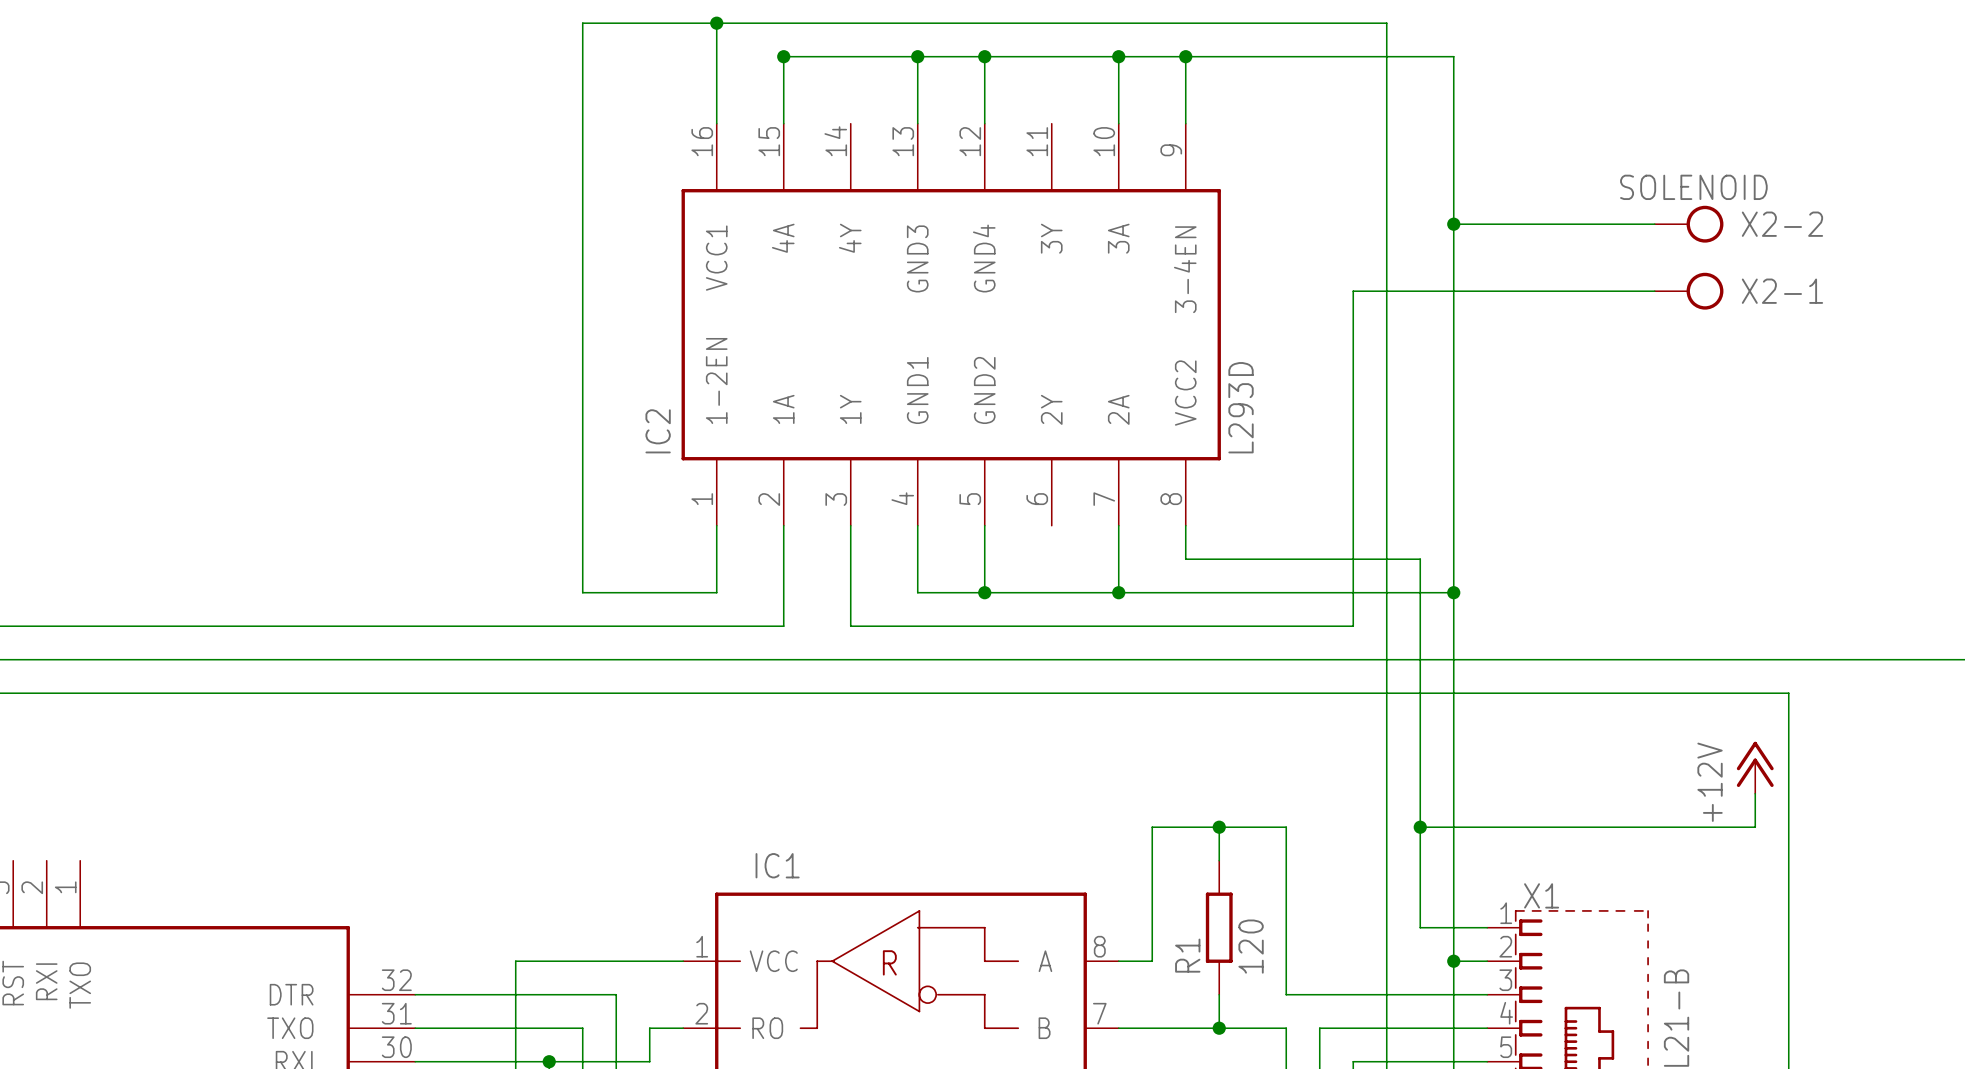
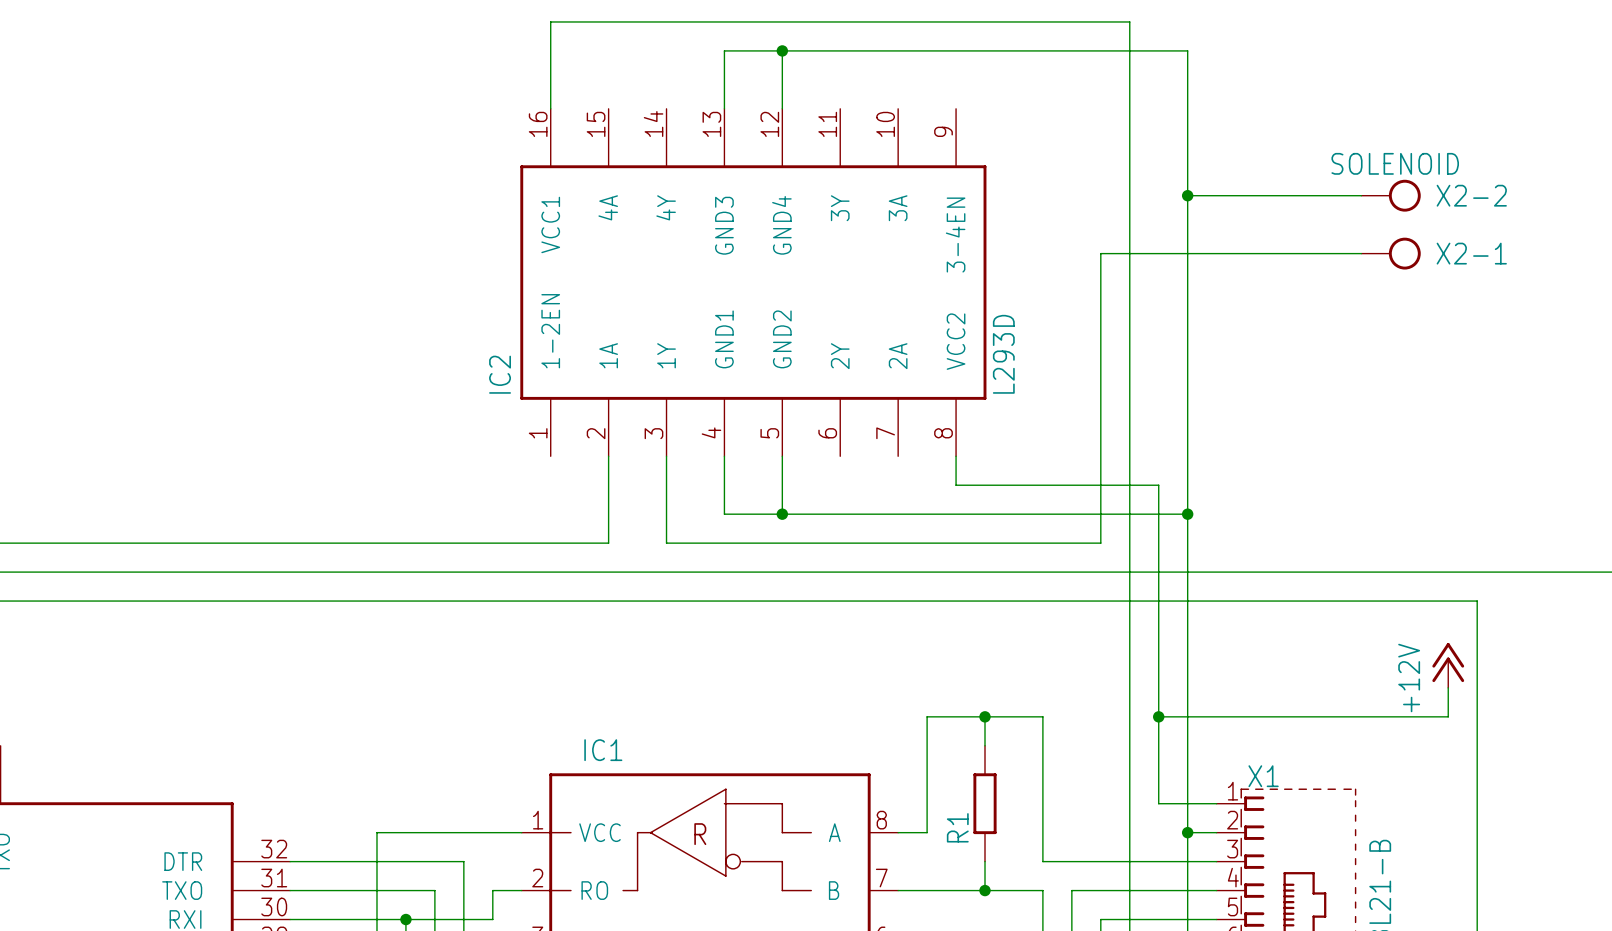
wire: (716, 23) (582, 23) (582, 592) (716, 592) (716, 525) -> none
junction: (716, 23) -> none
junction: (783, 56) -> none
wire: (917, 56) (783, 56) (783, 123) -> none
junction: (917, 56) -> none
wire: (1118, 56) (1118, 123) -> none
junction: (1118, 56) -> none
wire: (1185, 56) (1185, 123) -> none
junction: (1185, 56) -> none
wire: (1118, 525) (1118, 592) -> none
junction: (1118, 592) -> none
R1 value: 120 (1251, 946) -> none

